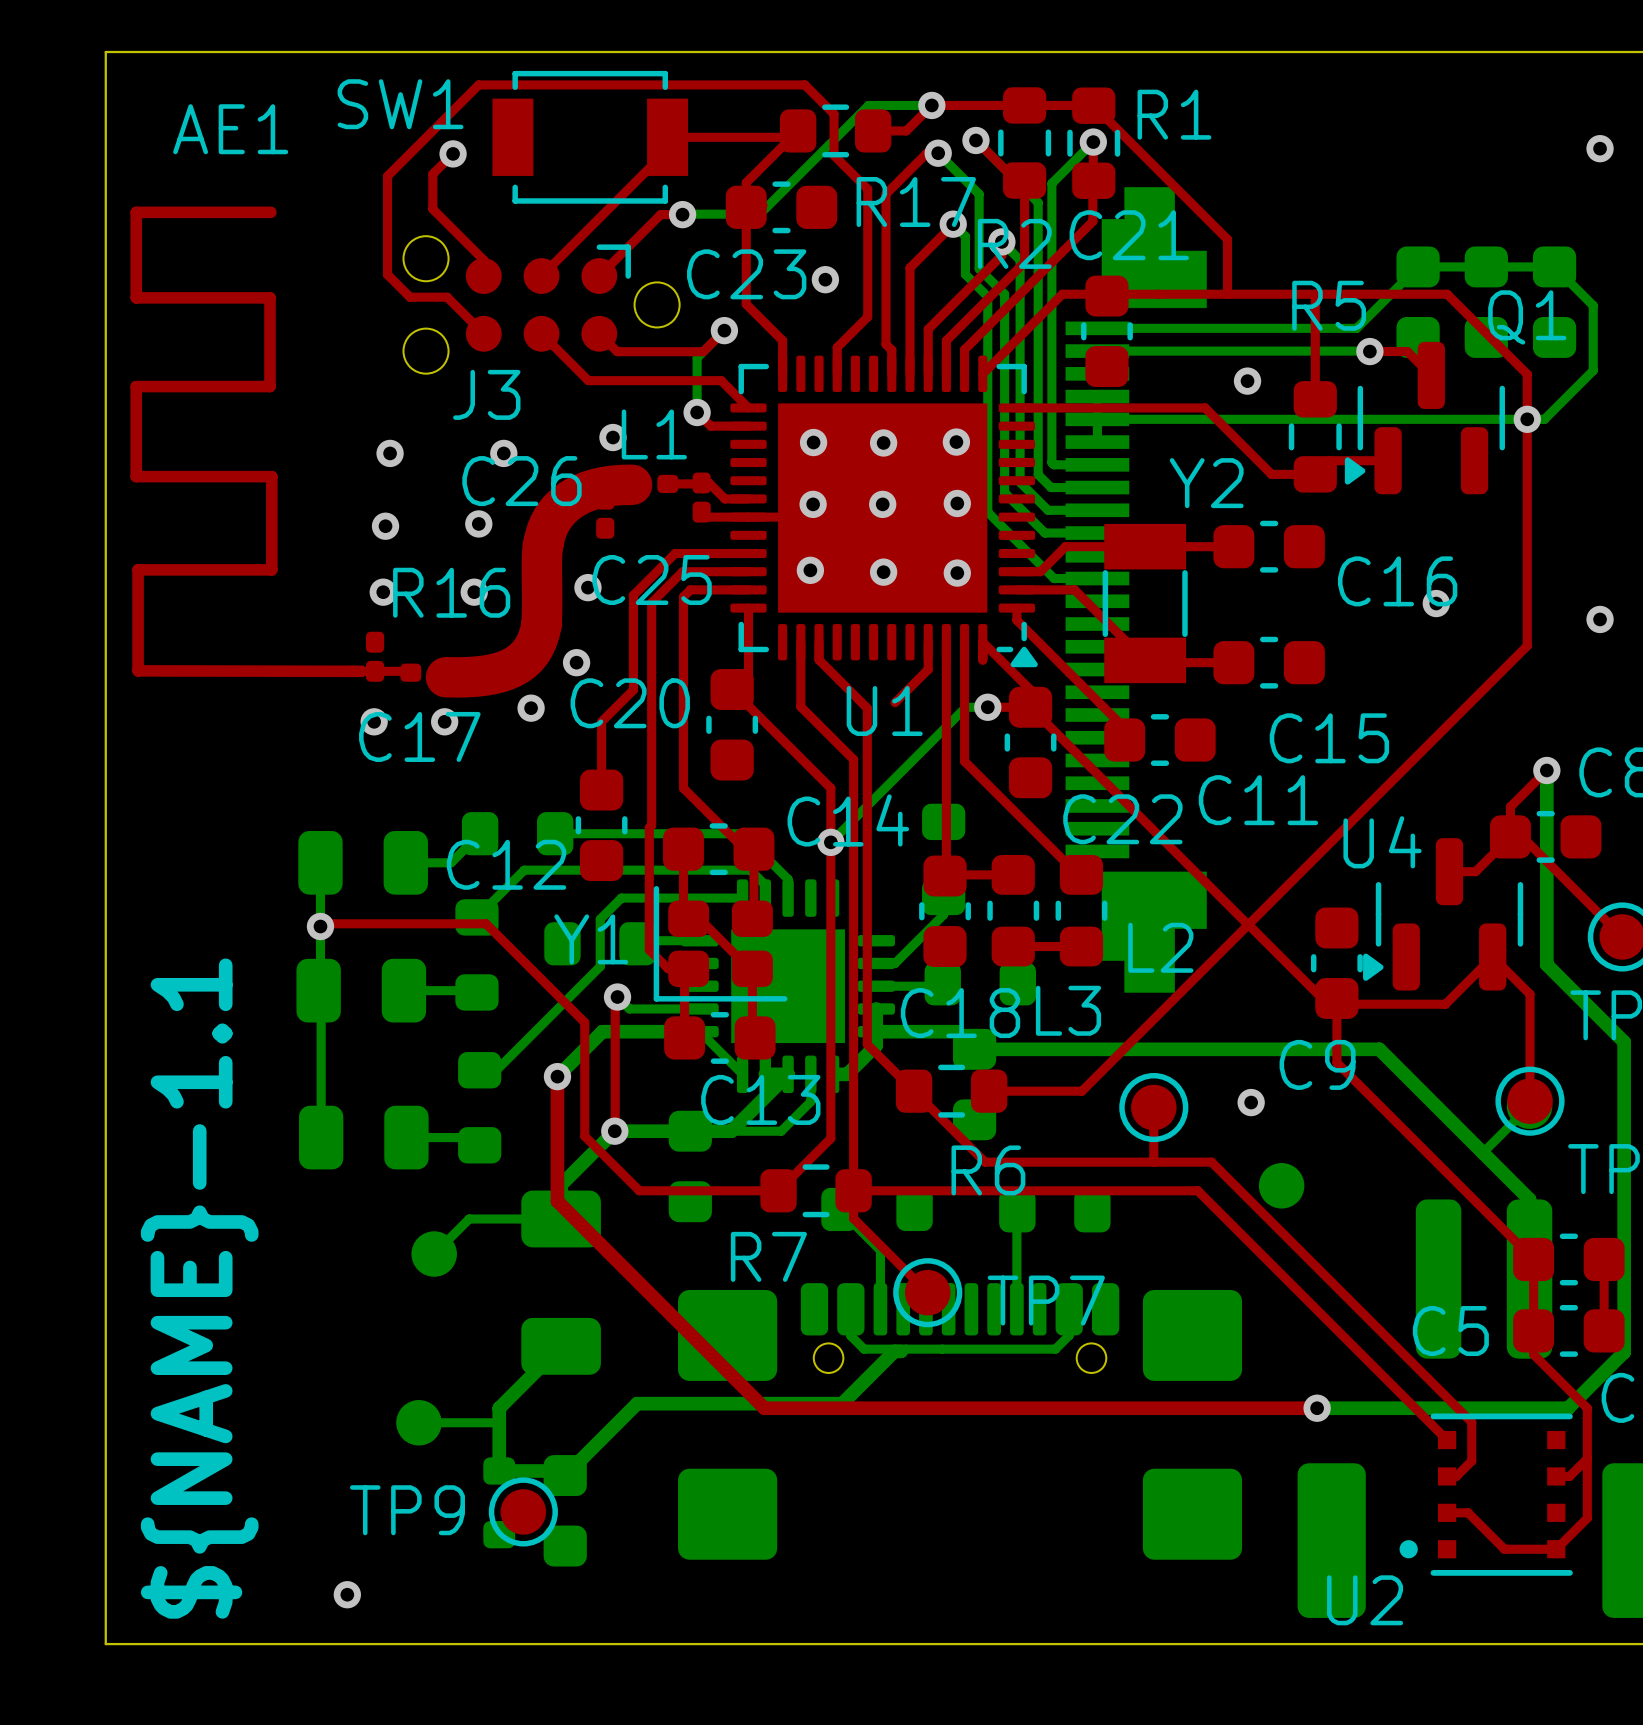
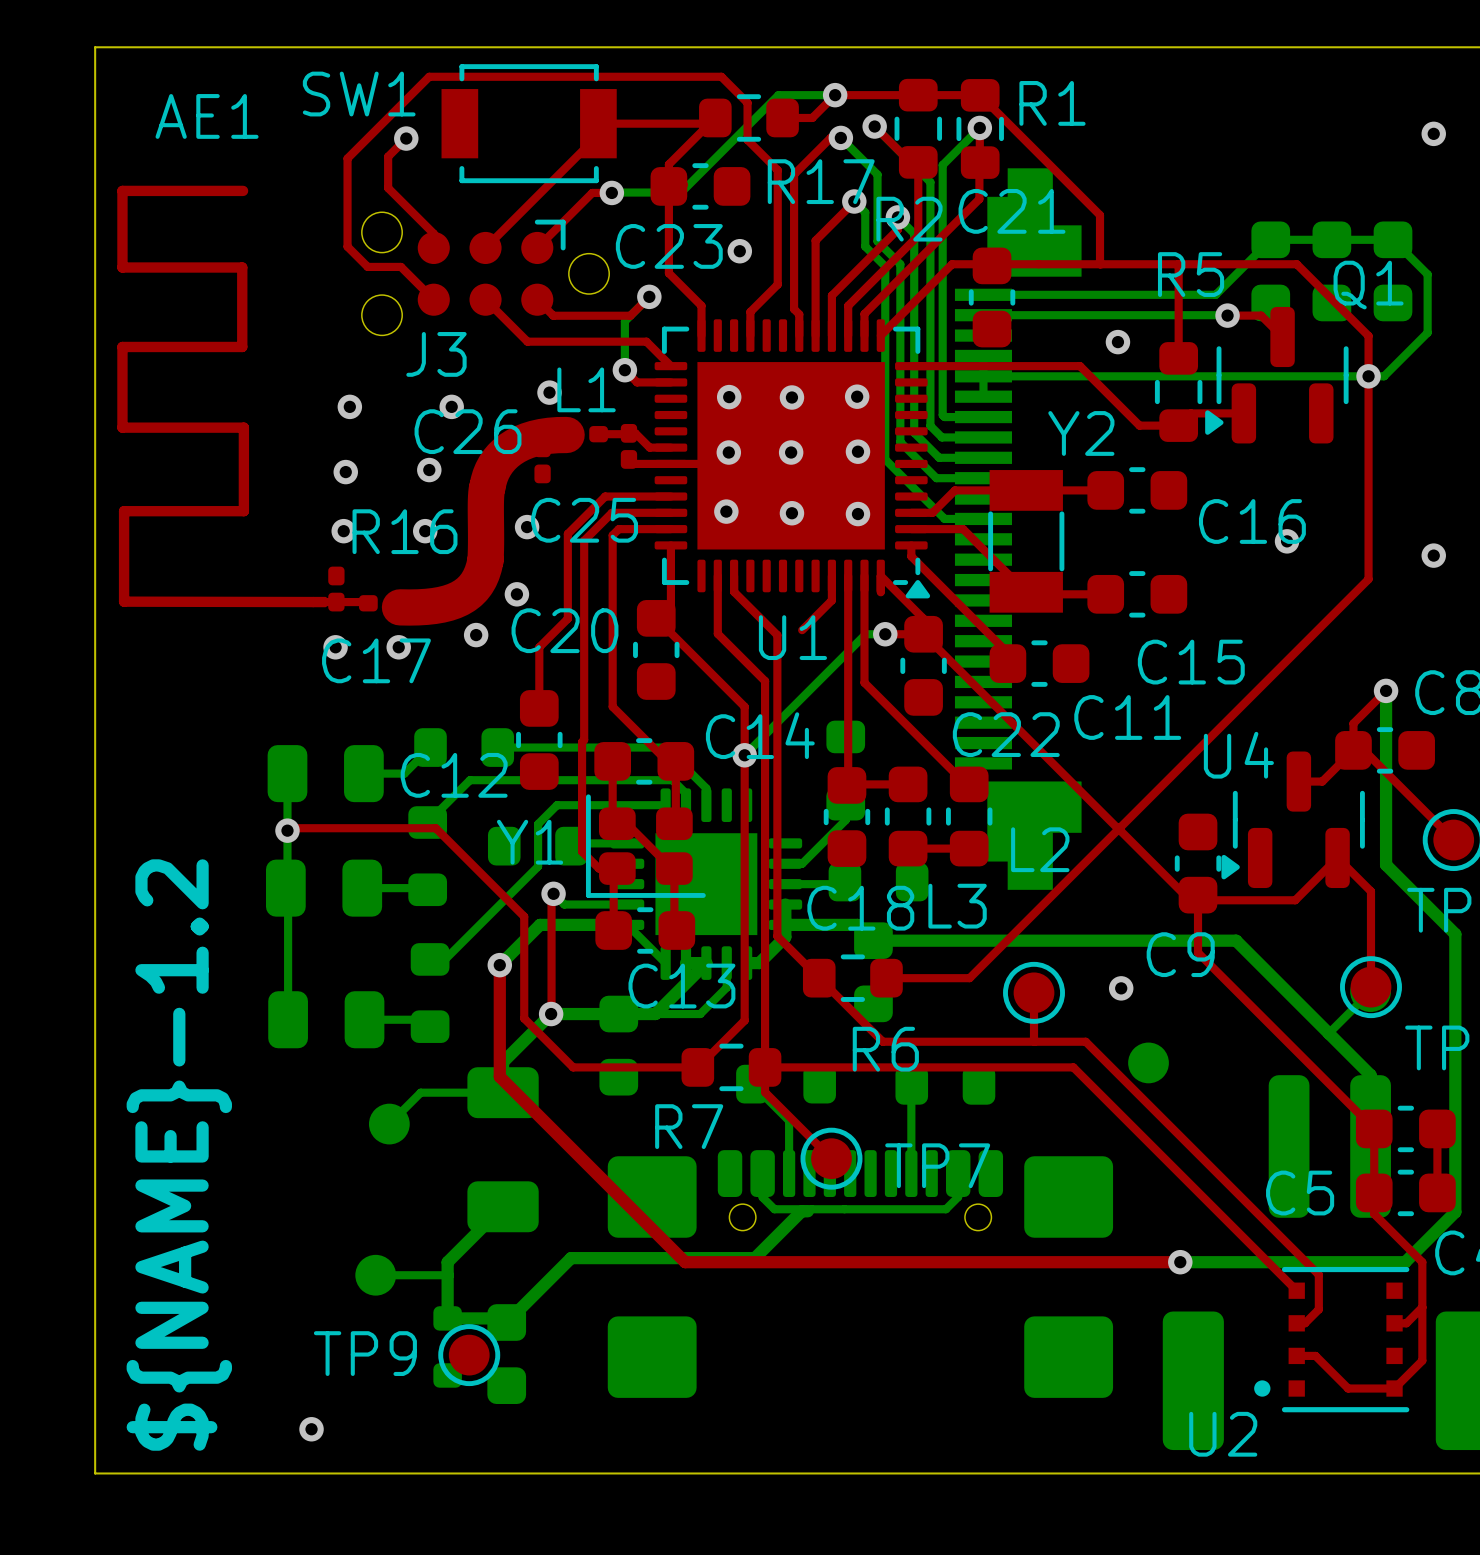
text: ${NAME}-1.1 (199, 1288) -> ${NAME}-1.2 (179, 1155)

